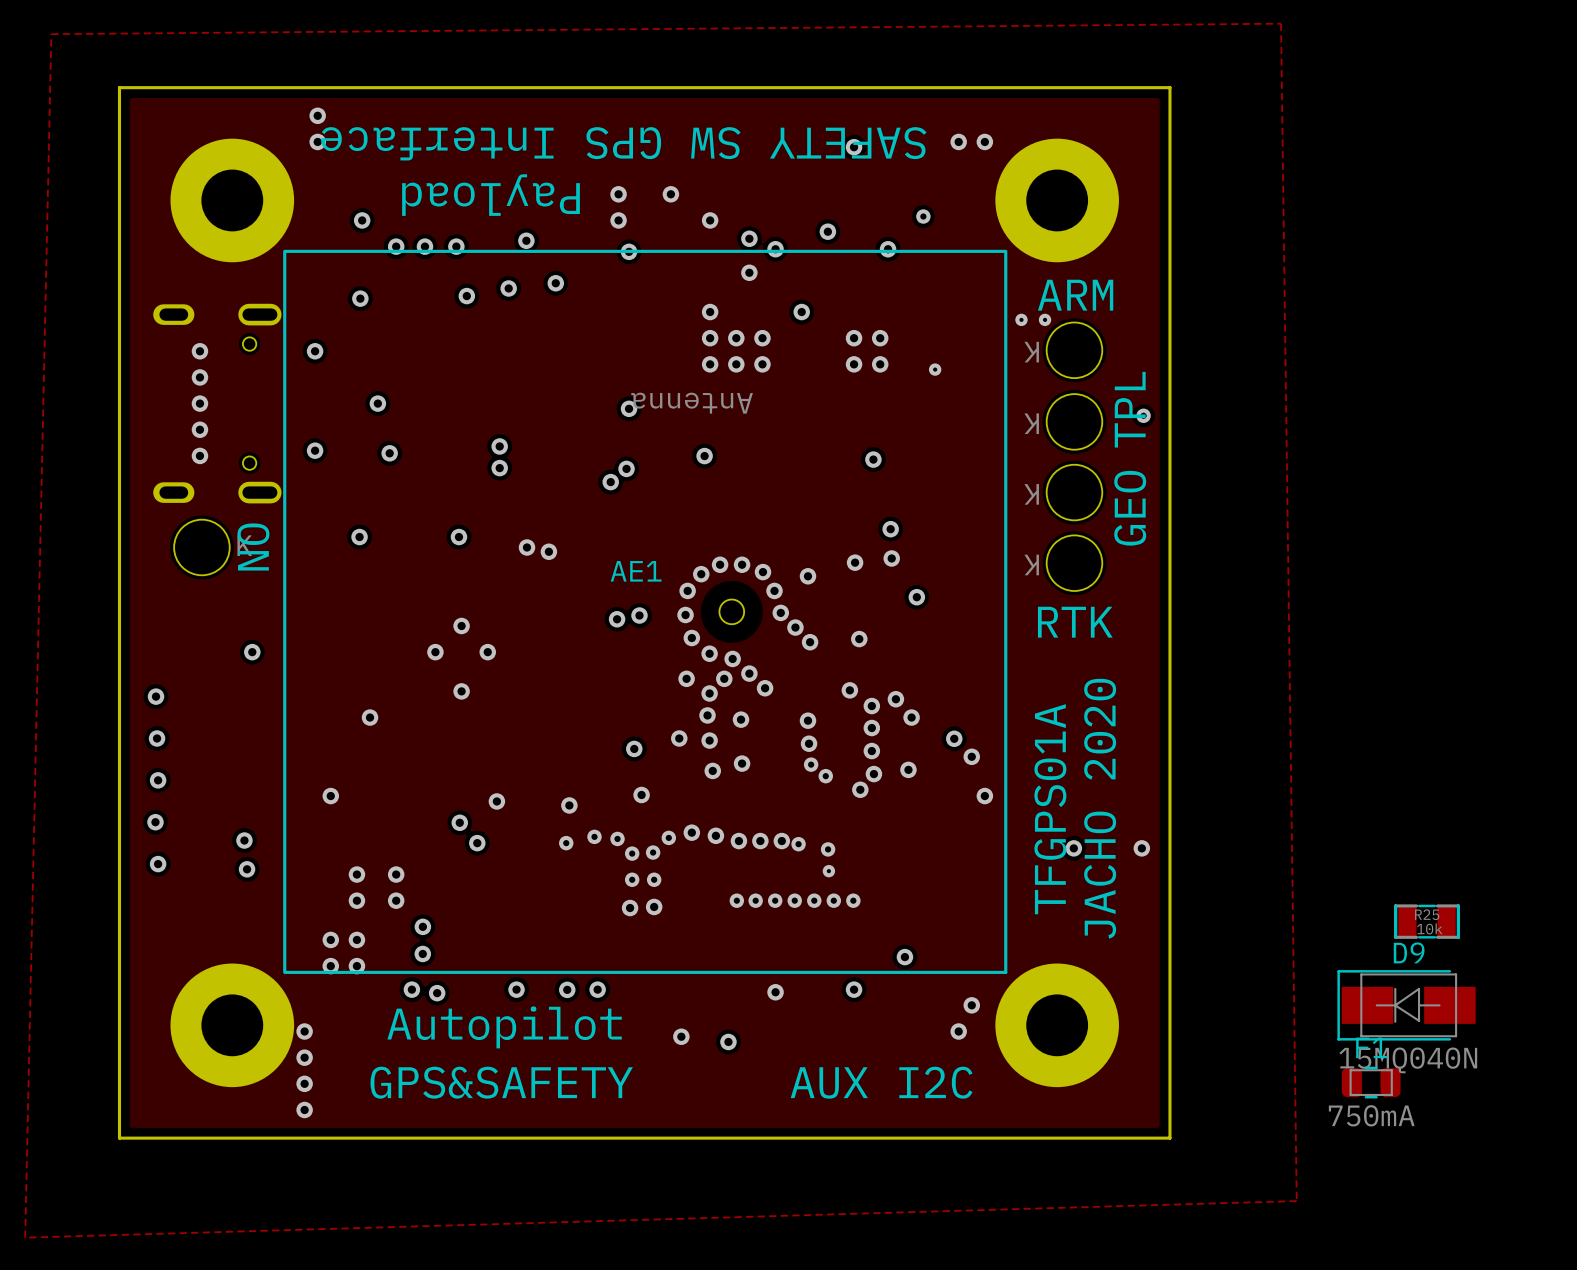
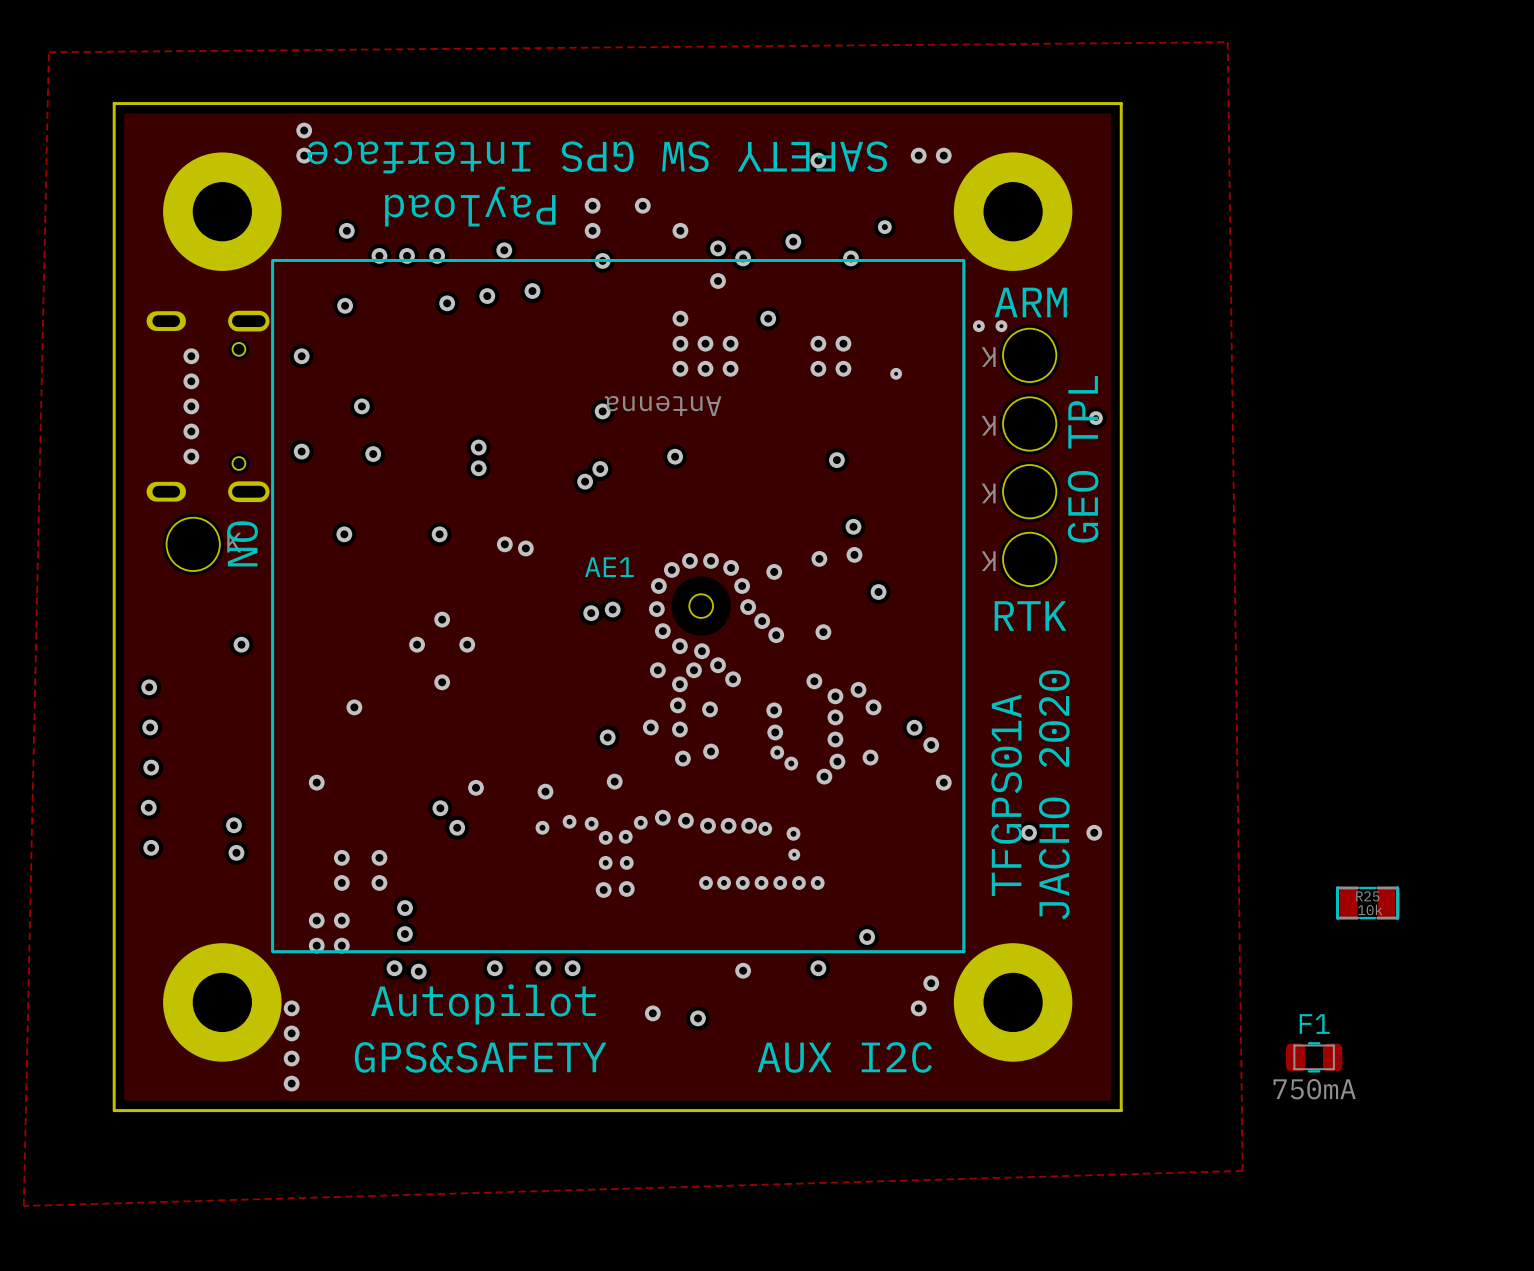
D9: 15MQ040N (1406, 1005) -> none

